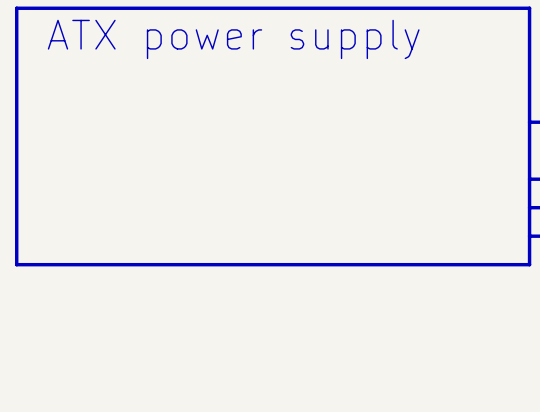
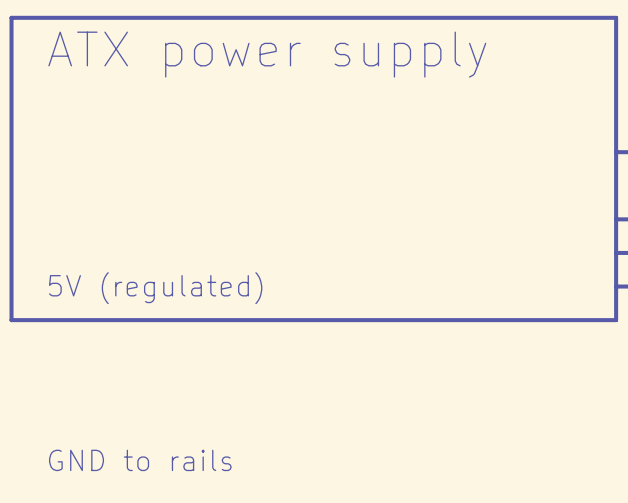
text: none -> 5V (regulated) (155, 288)
text: none -> GND to rails (140, 460)

